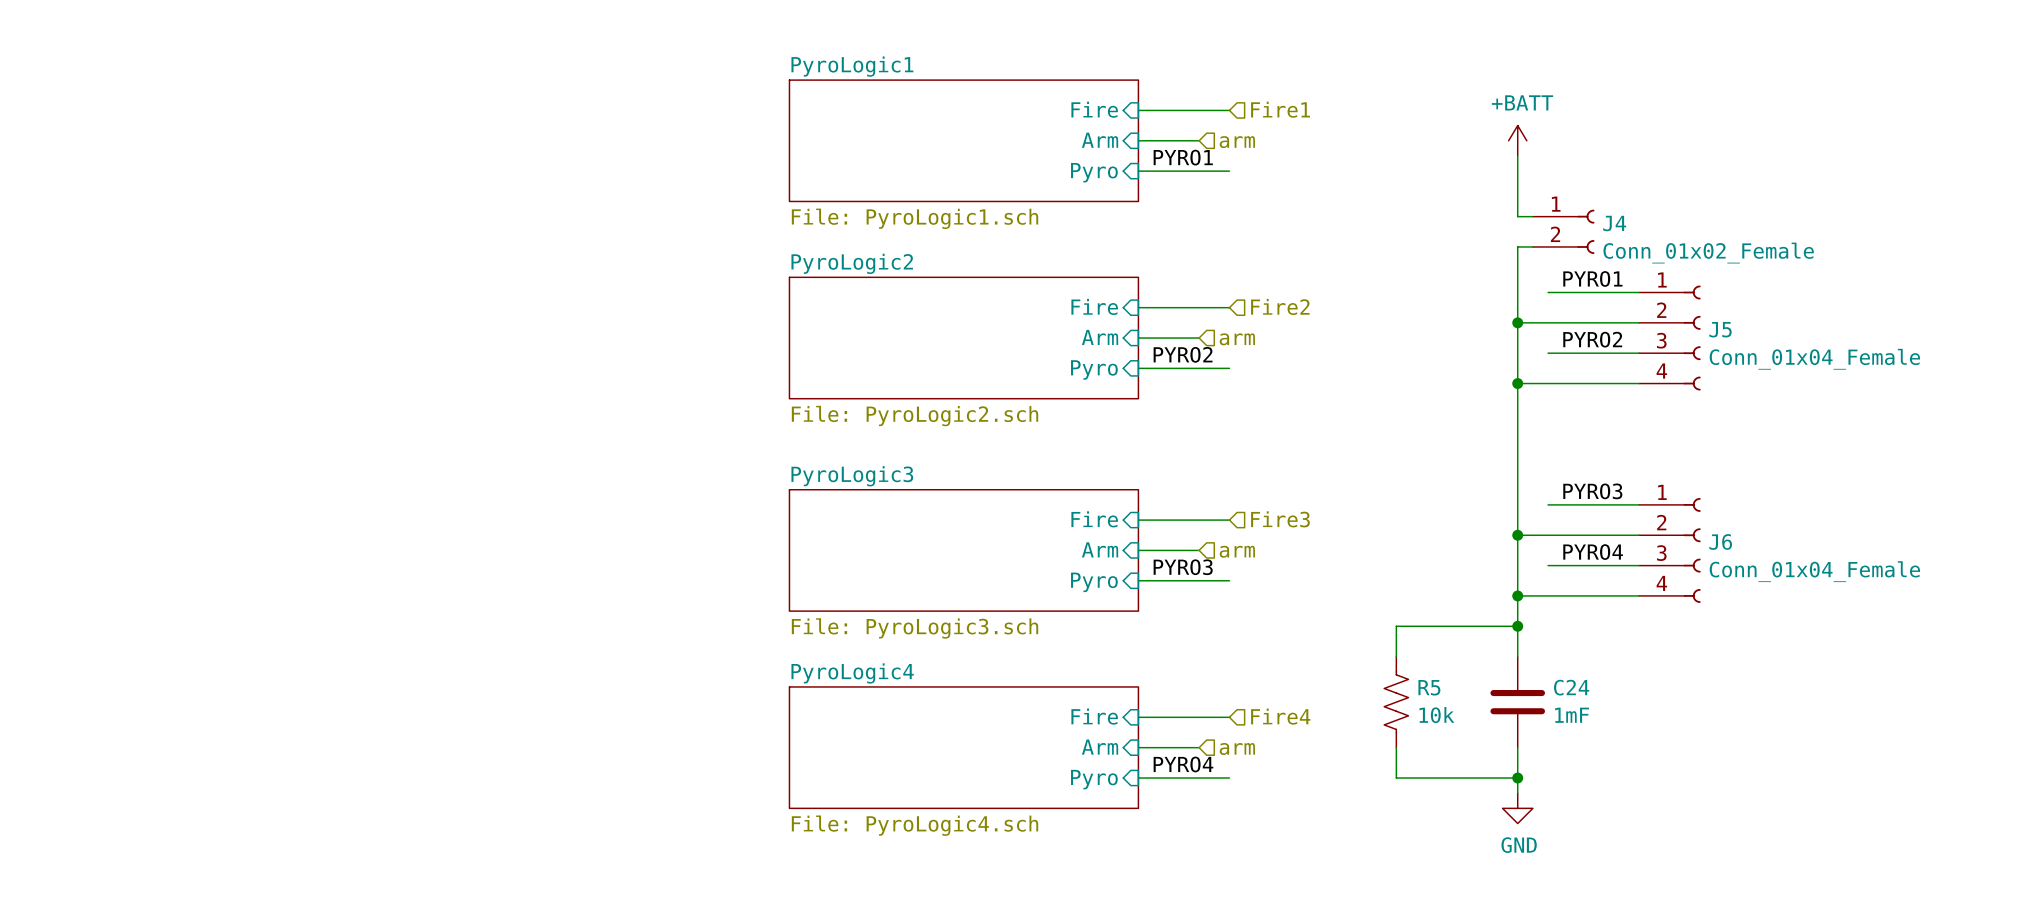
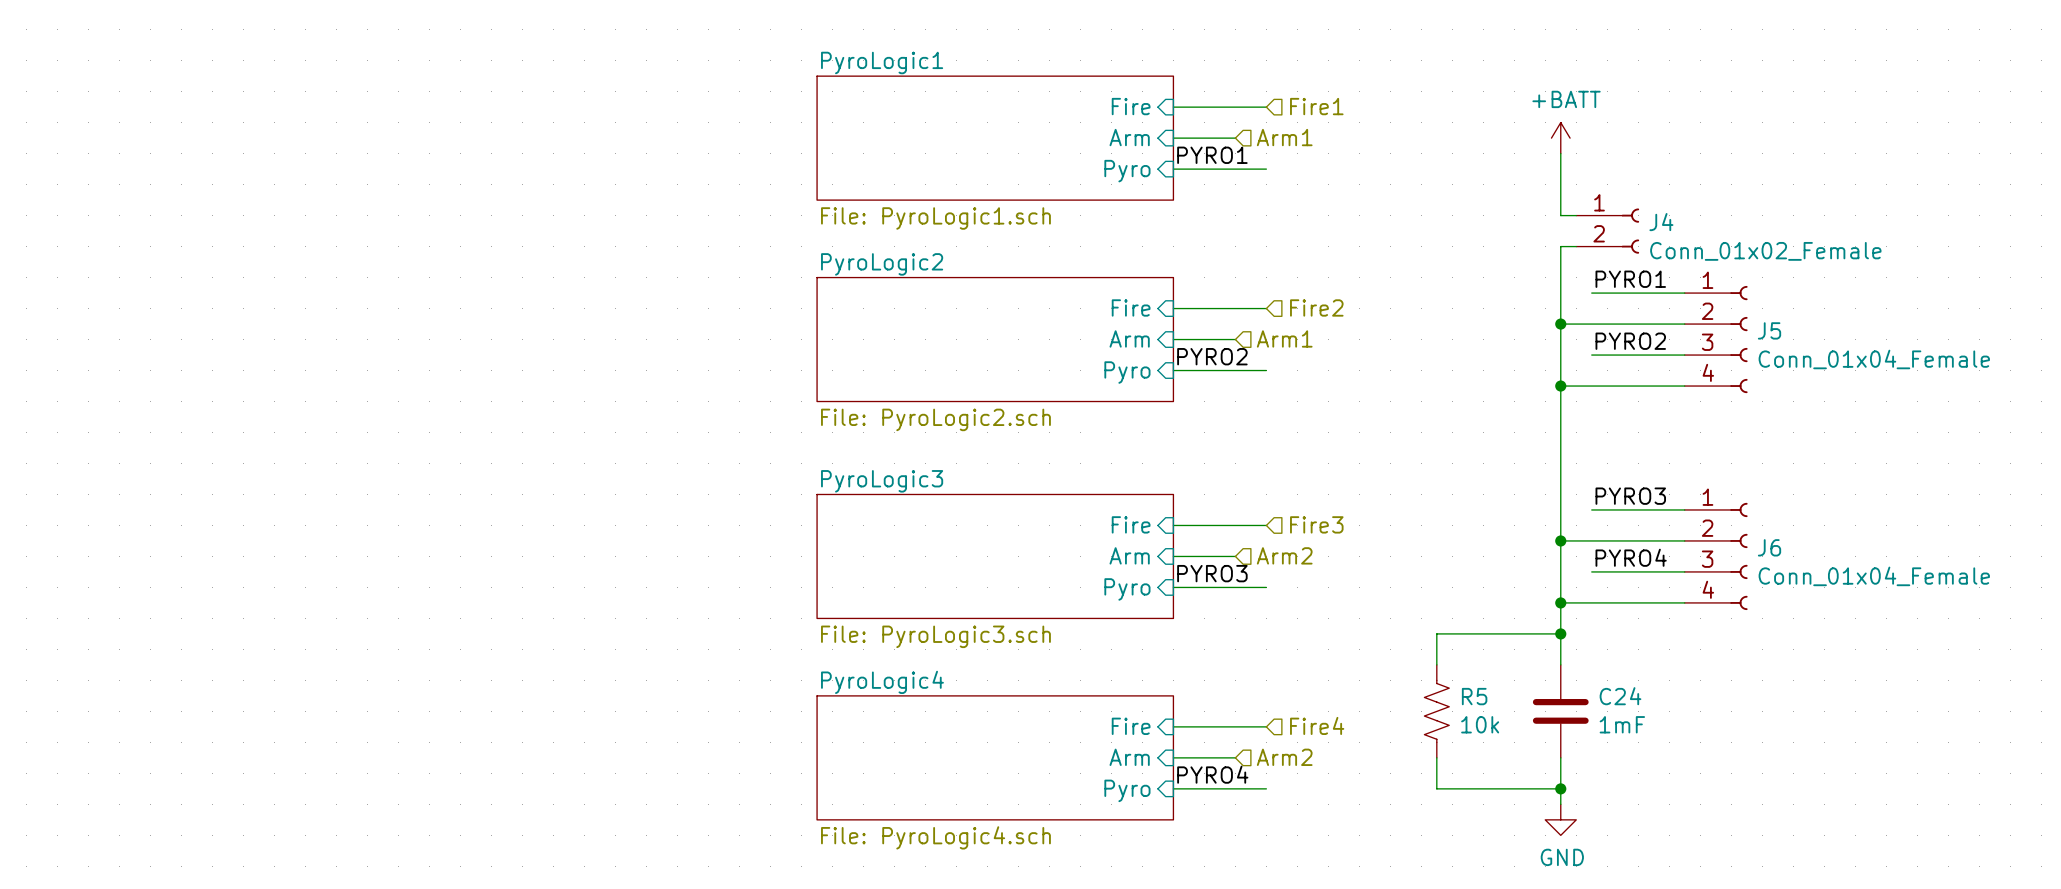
hierarchical label: arm (1237, 142) -> Arm1 (1284, 137)
hierarchical label: arm (1237, 339) -> Arm1 (1284, 338)
hierarchical label: arm (1237, 551) -> Arm2 (1284, 555)
hierarchical label: arm (1237, 749) -> Arm2 (1284, 757)

